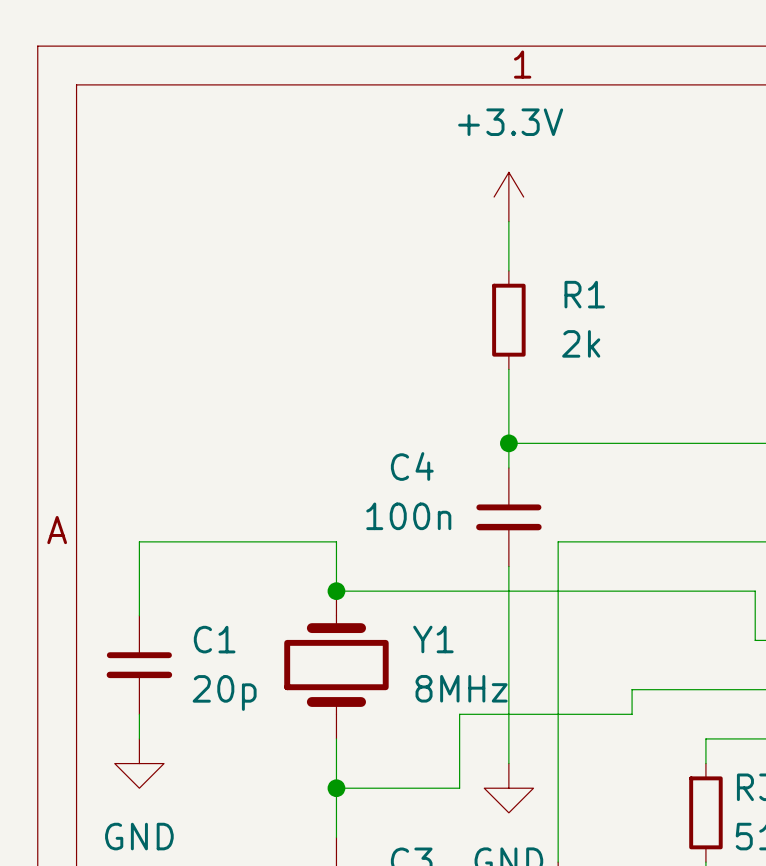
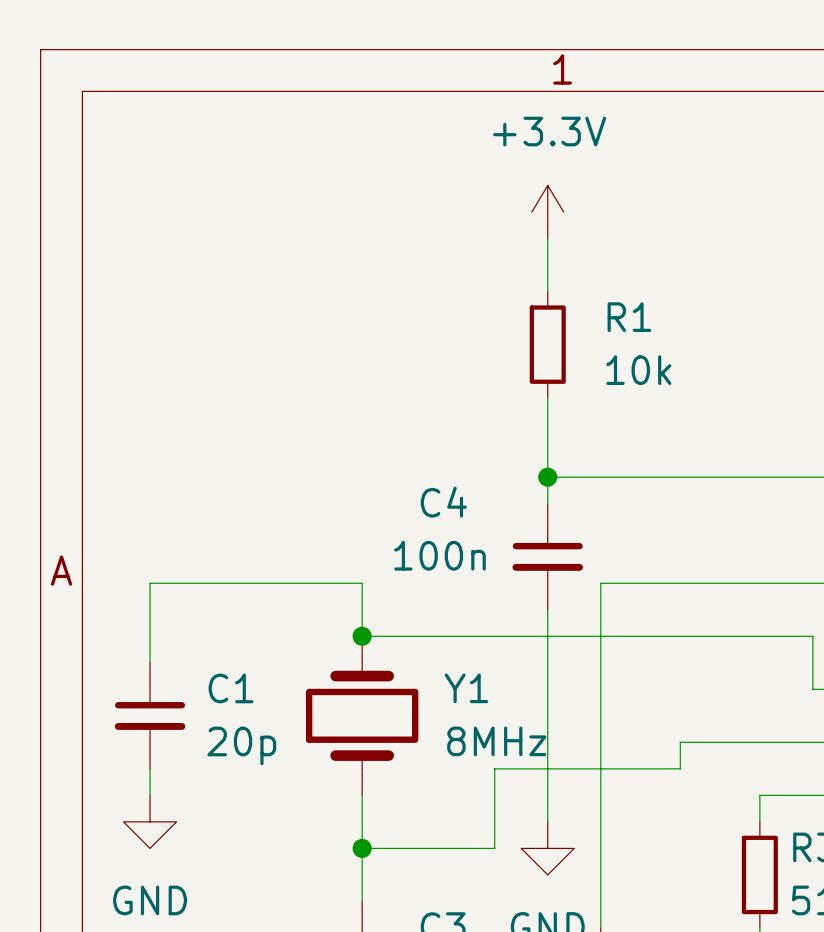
R1 value: 2k (581, 343) -> 10k (638, 370)

